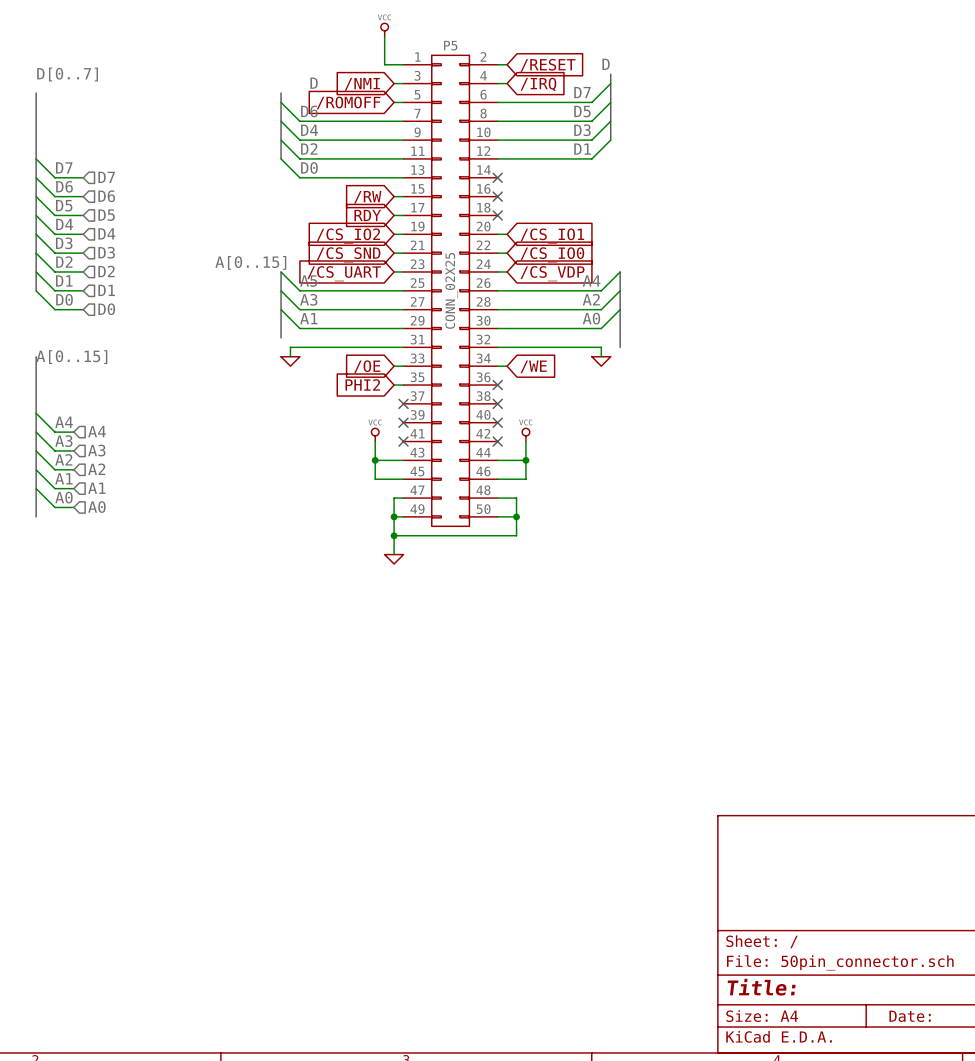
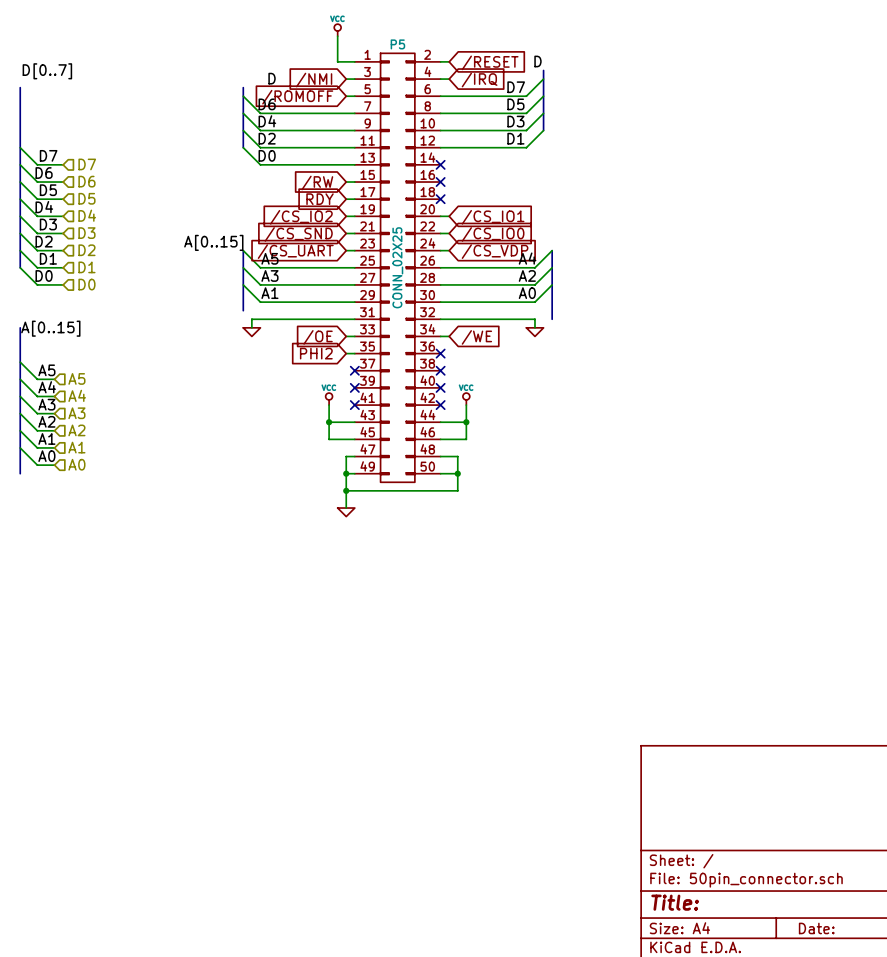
wire: none -> (20, 362) (37, 379) (54, 379)
label: none -> A5 (46, 370)
hierarchical label: none -> A5 (76, 378)

